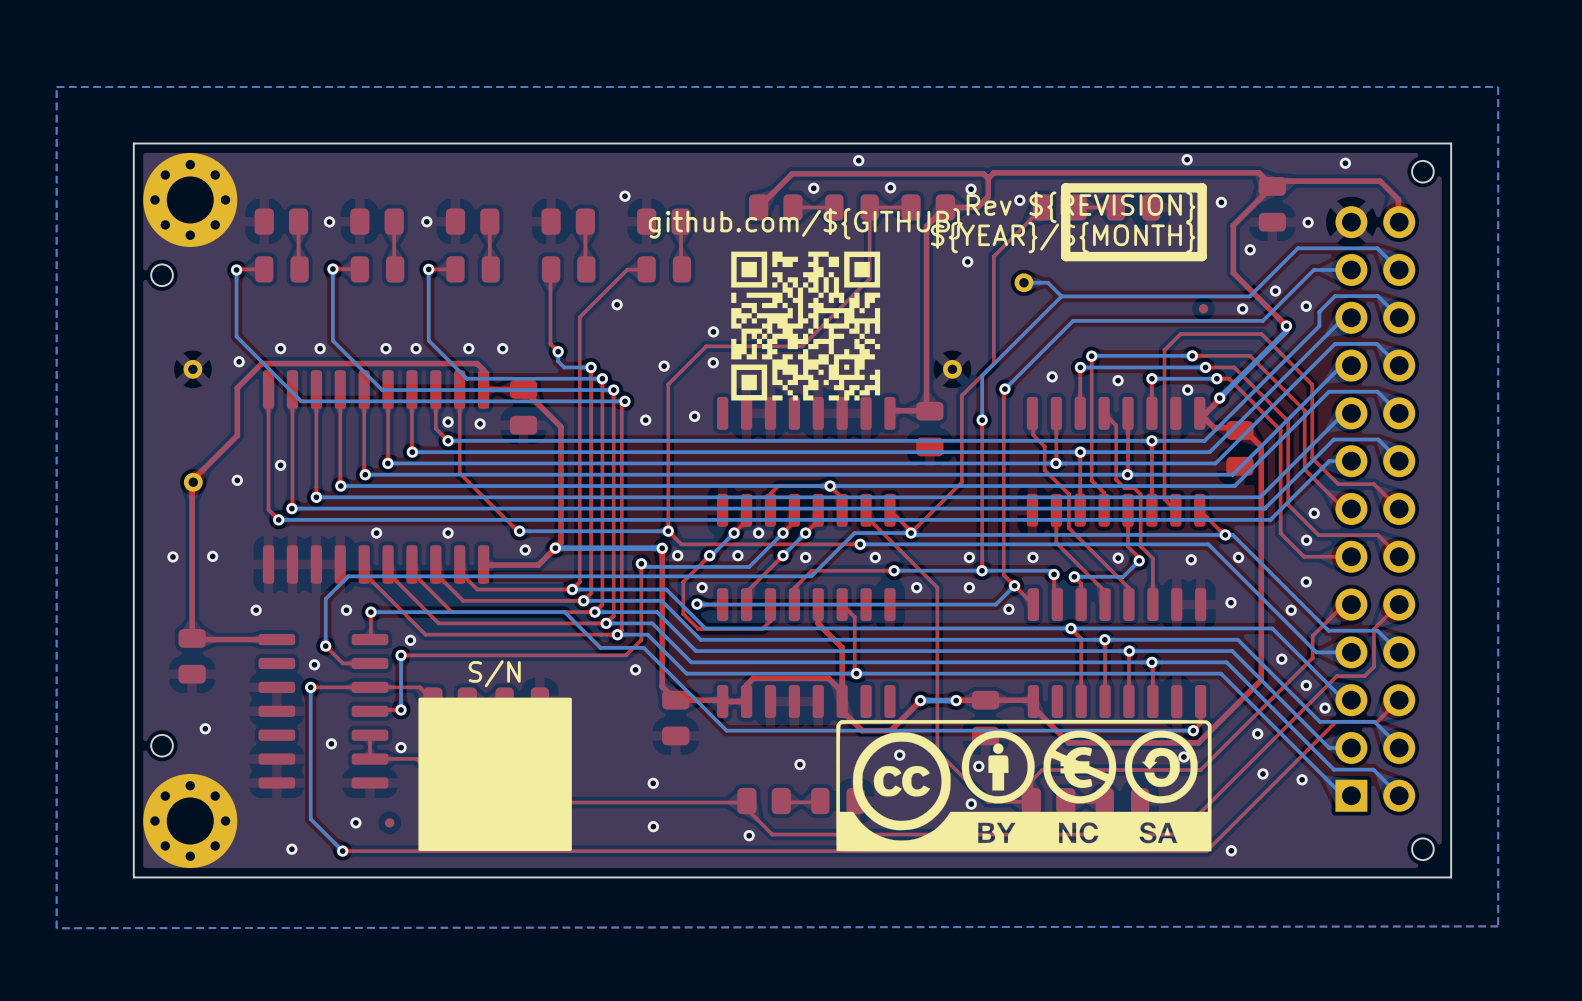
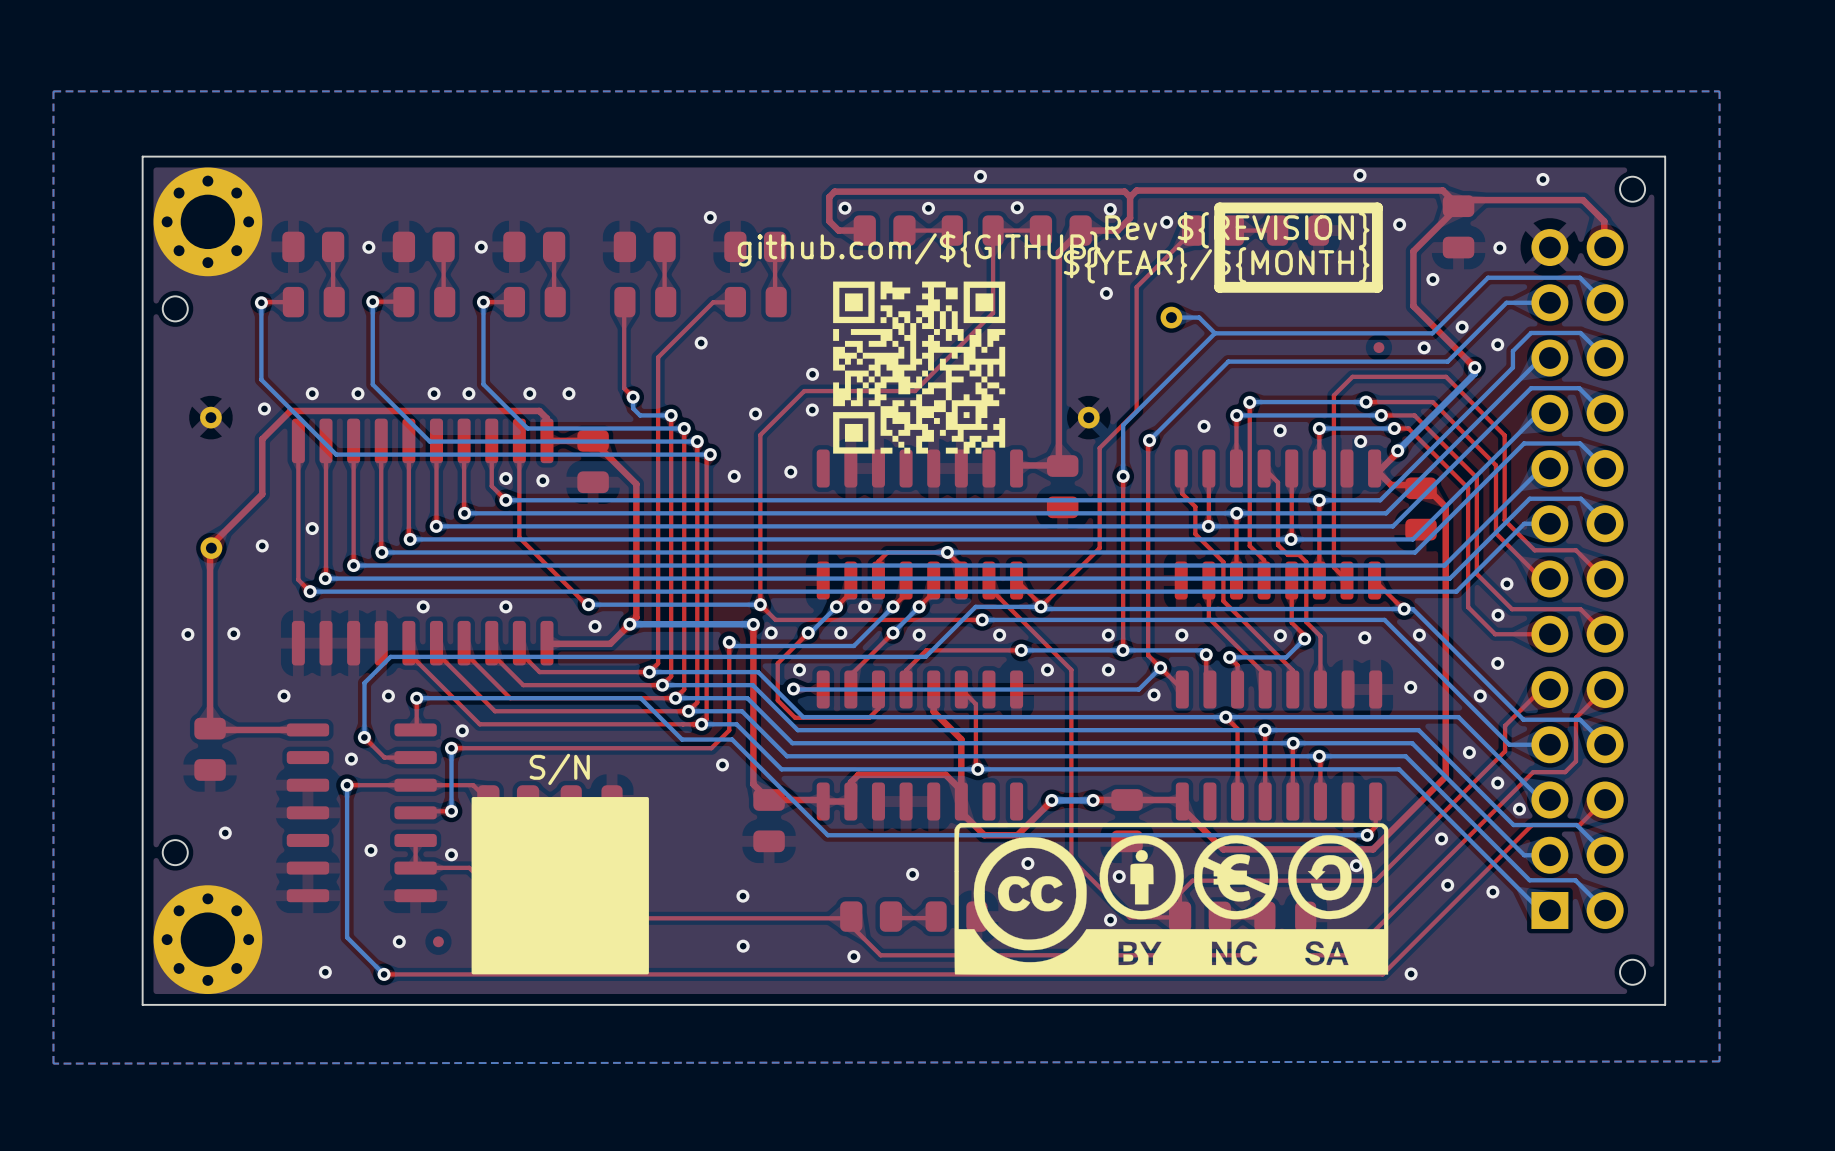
top track: (792, 173) (758, 207) -> (903, 191) (834, 191) (829, 197) (829, 221) (838, 230) (864, 230)
via: none -> (844, 208)

